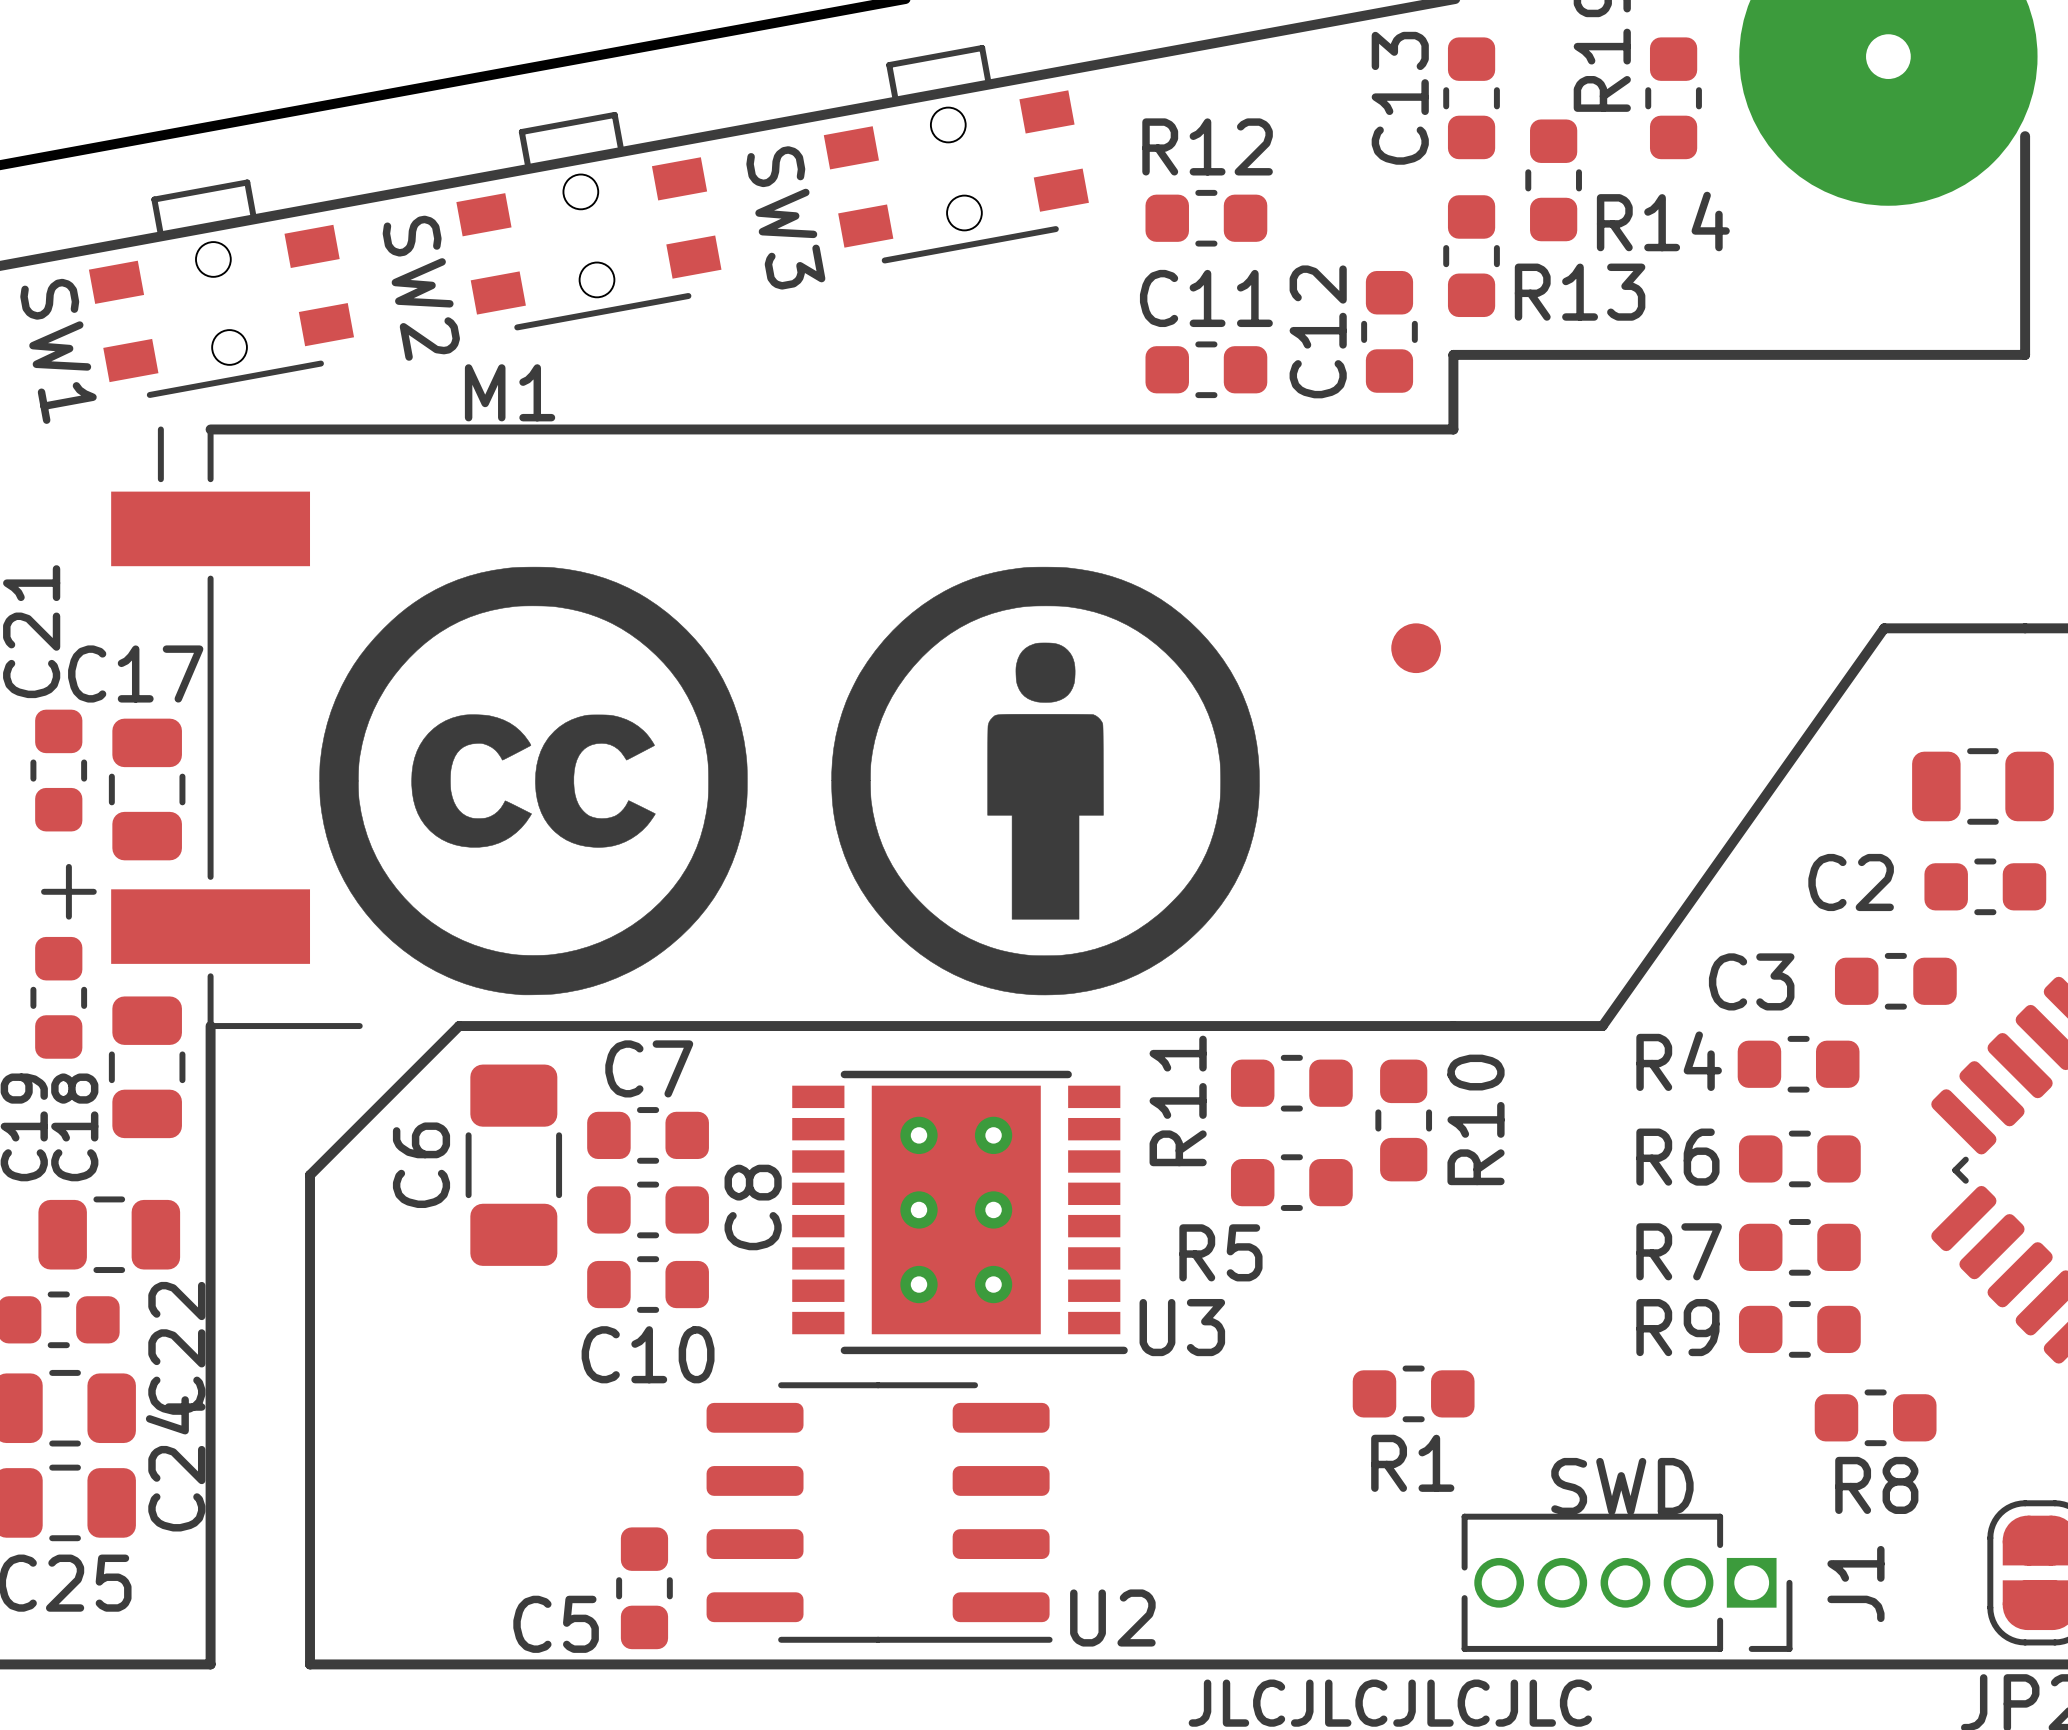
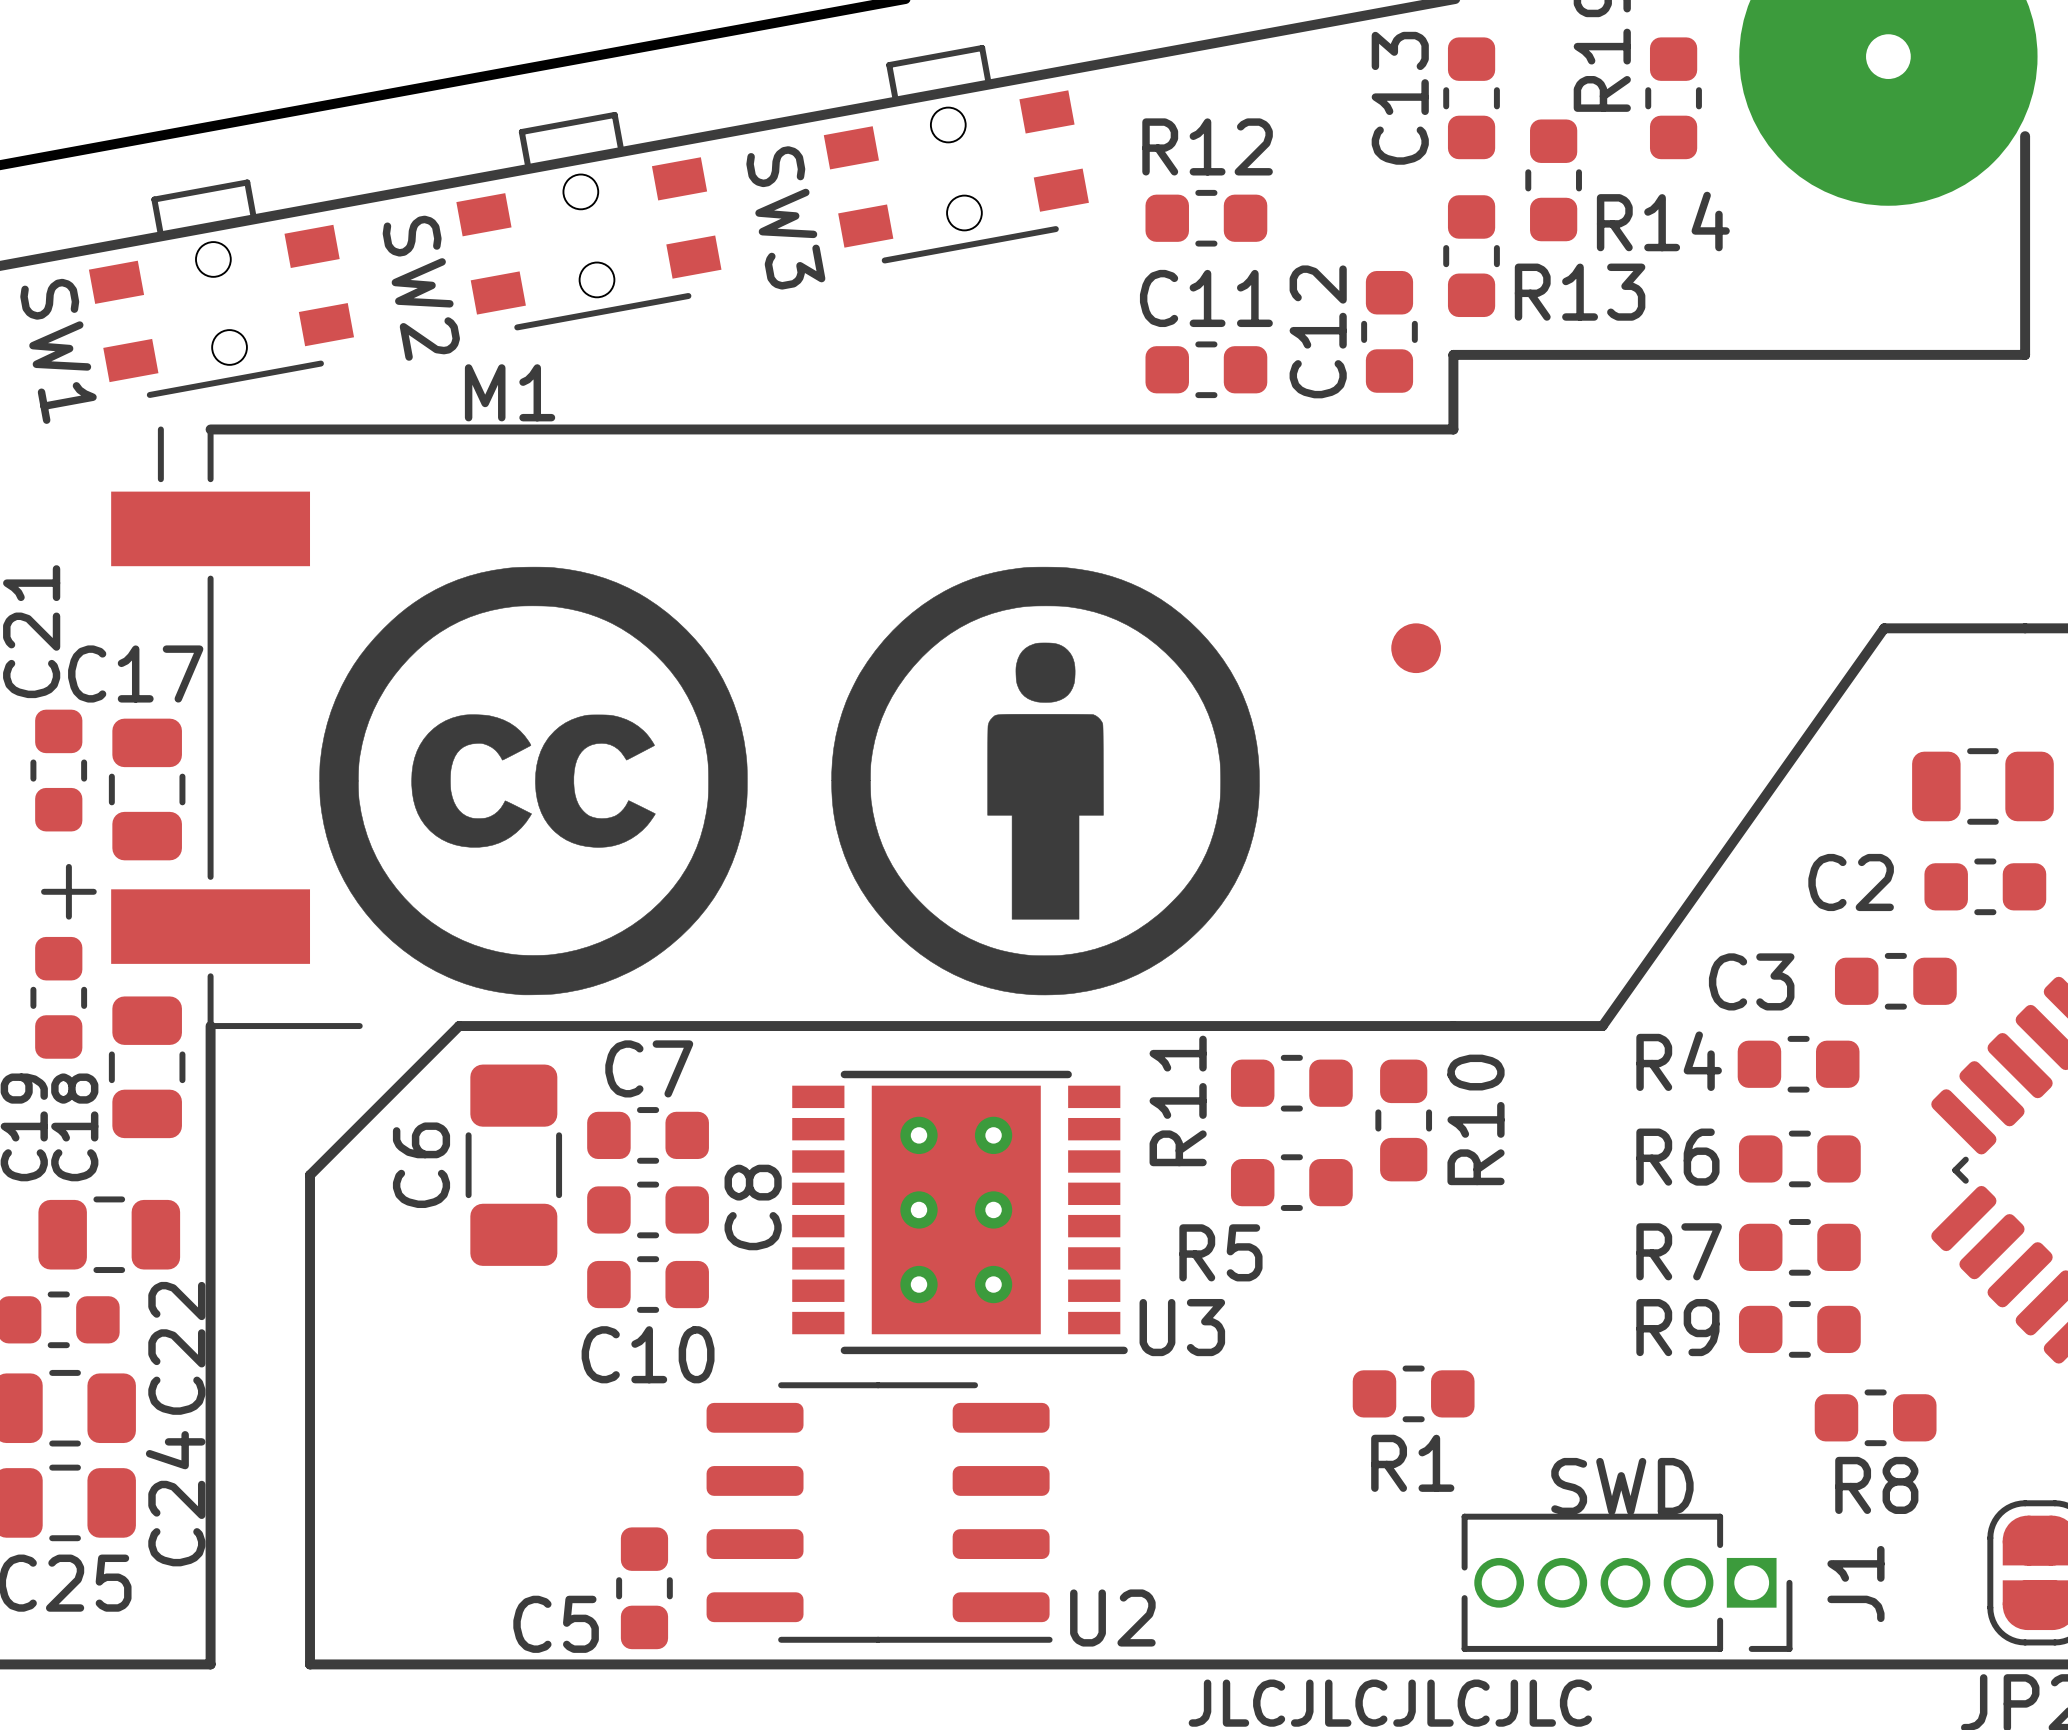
C24 name position: C24 (175, 1463) -> C24 (175, 1498)

